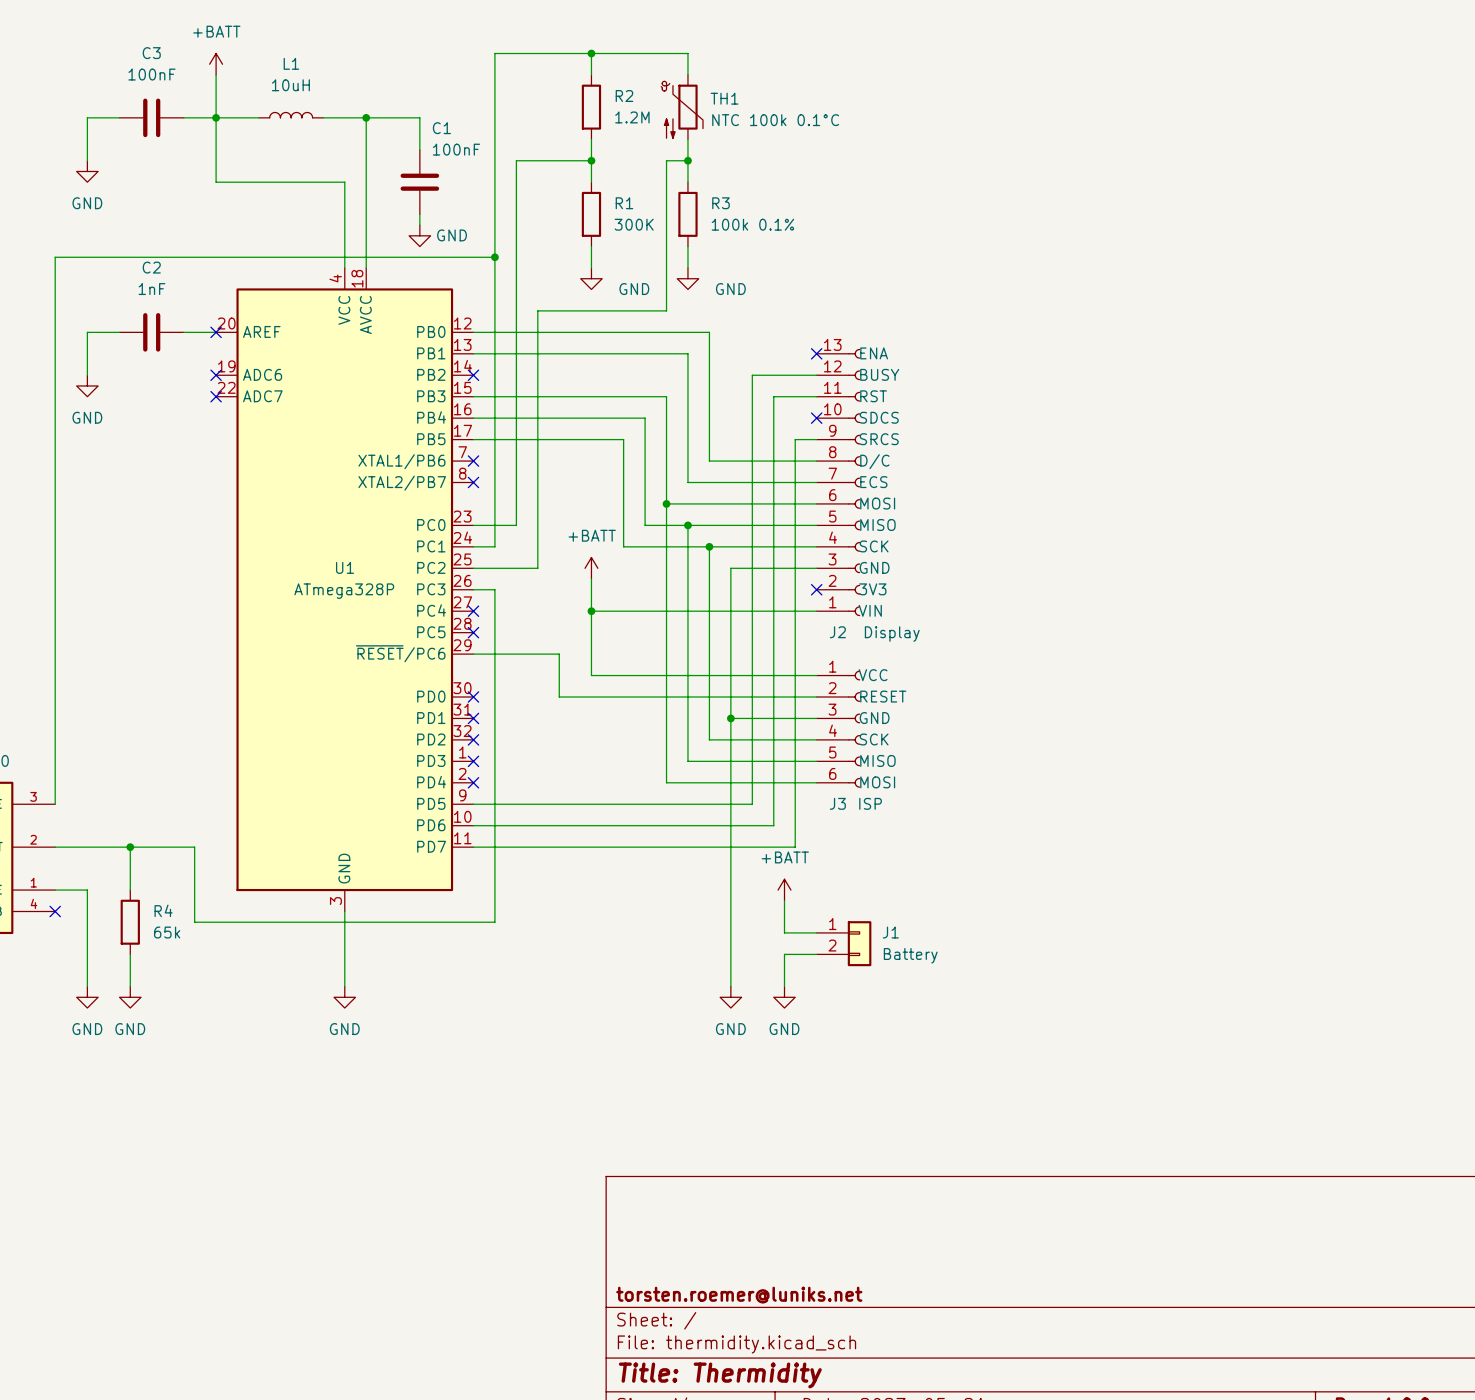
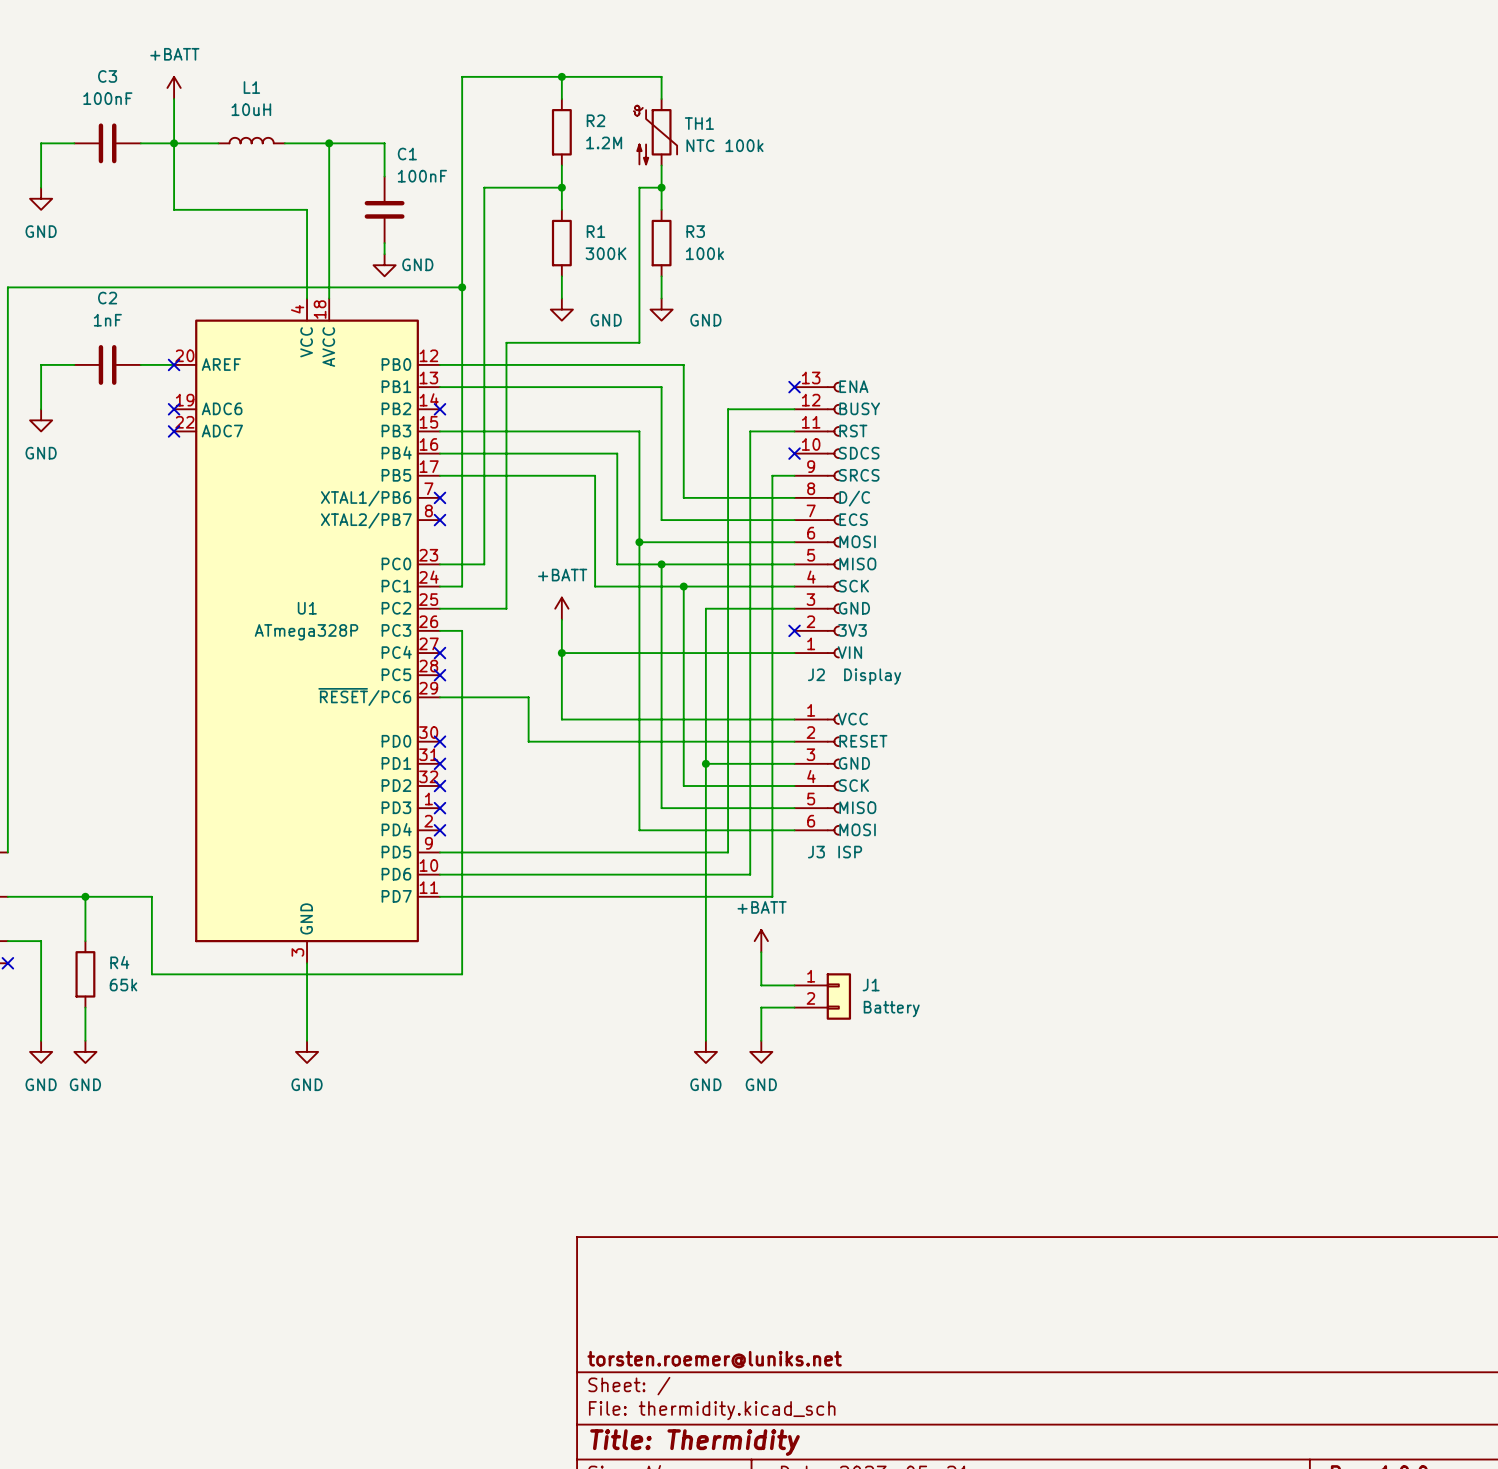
TH1 value: NTC 100k 0.1°C (775, 120) -> NTC 100k (724, 145)
R3 value: 100k 0.1% (752, 224) -> 100k (704, 253)

